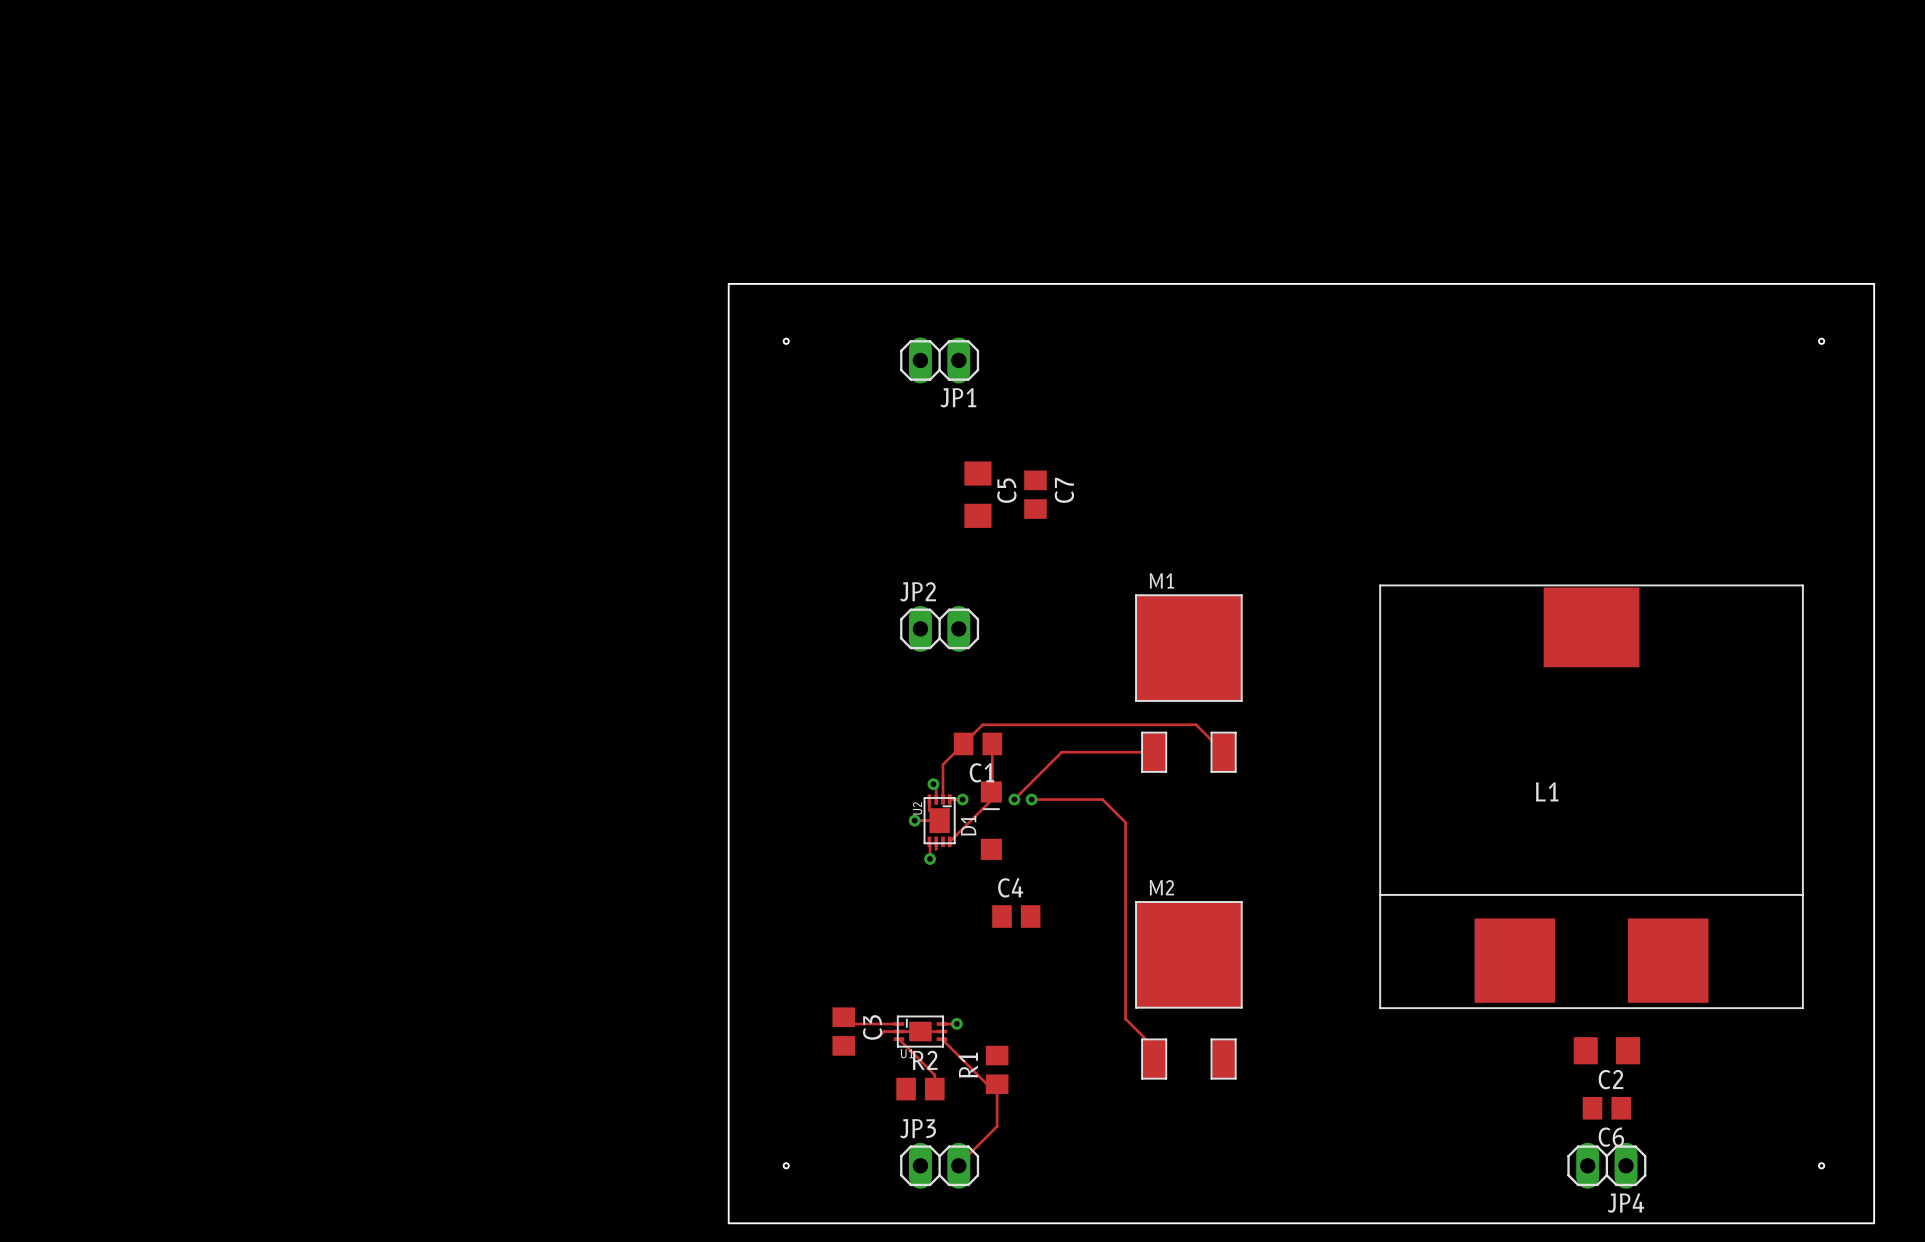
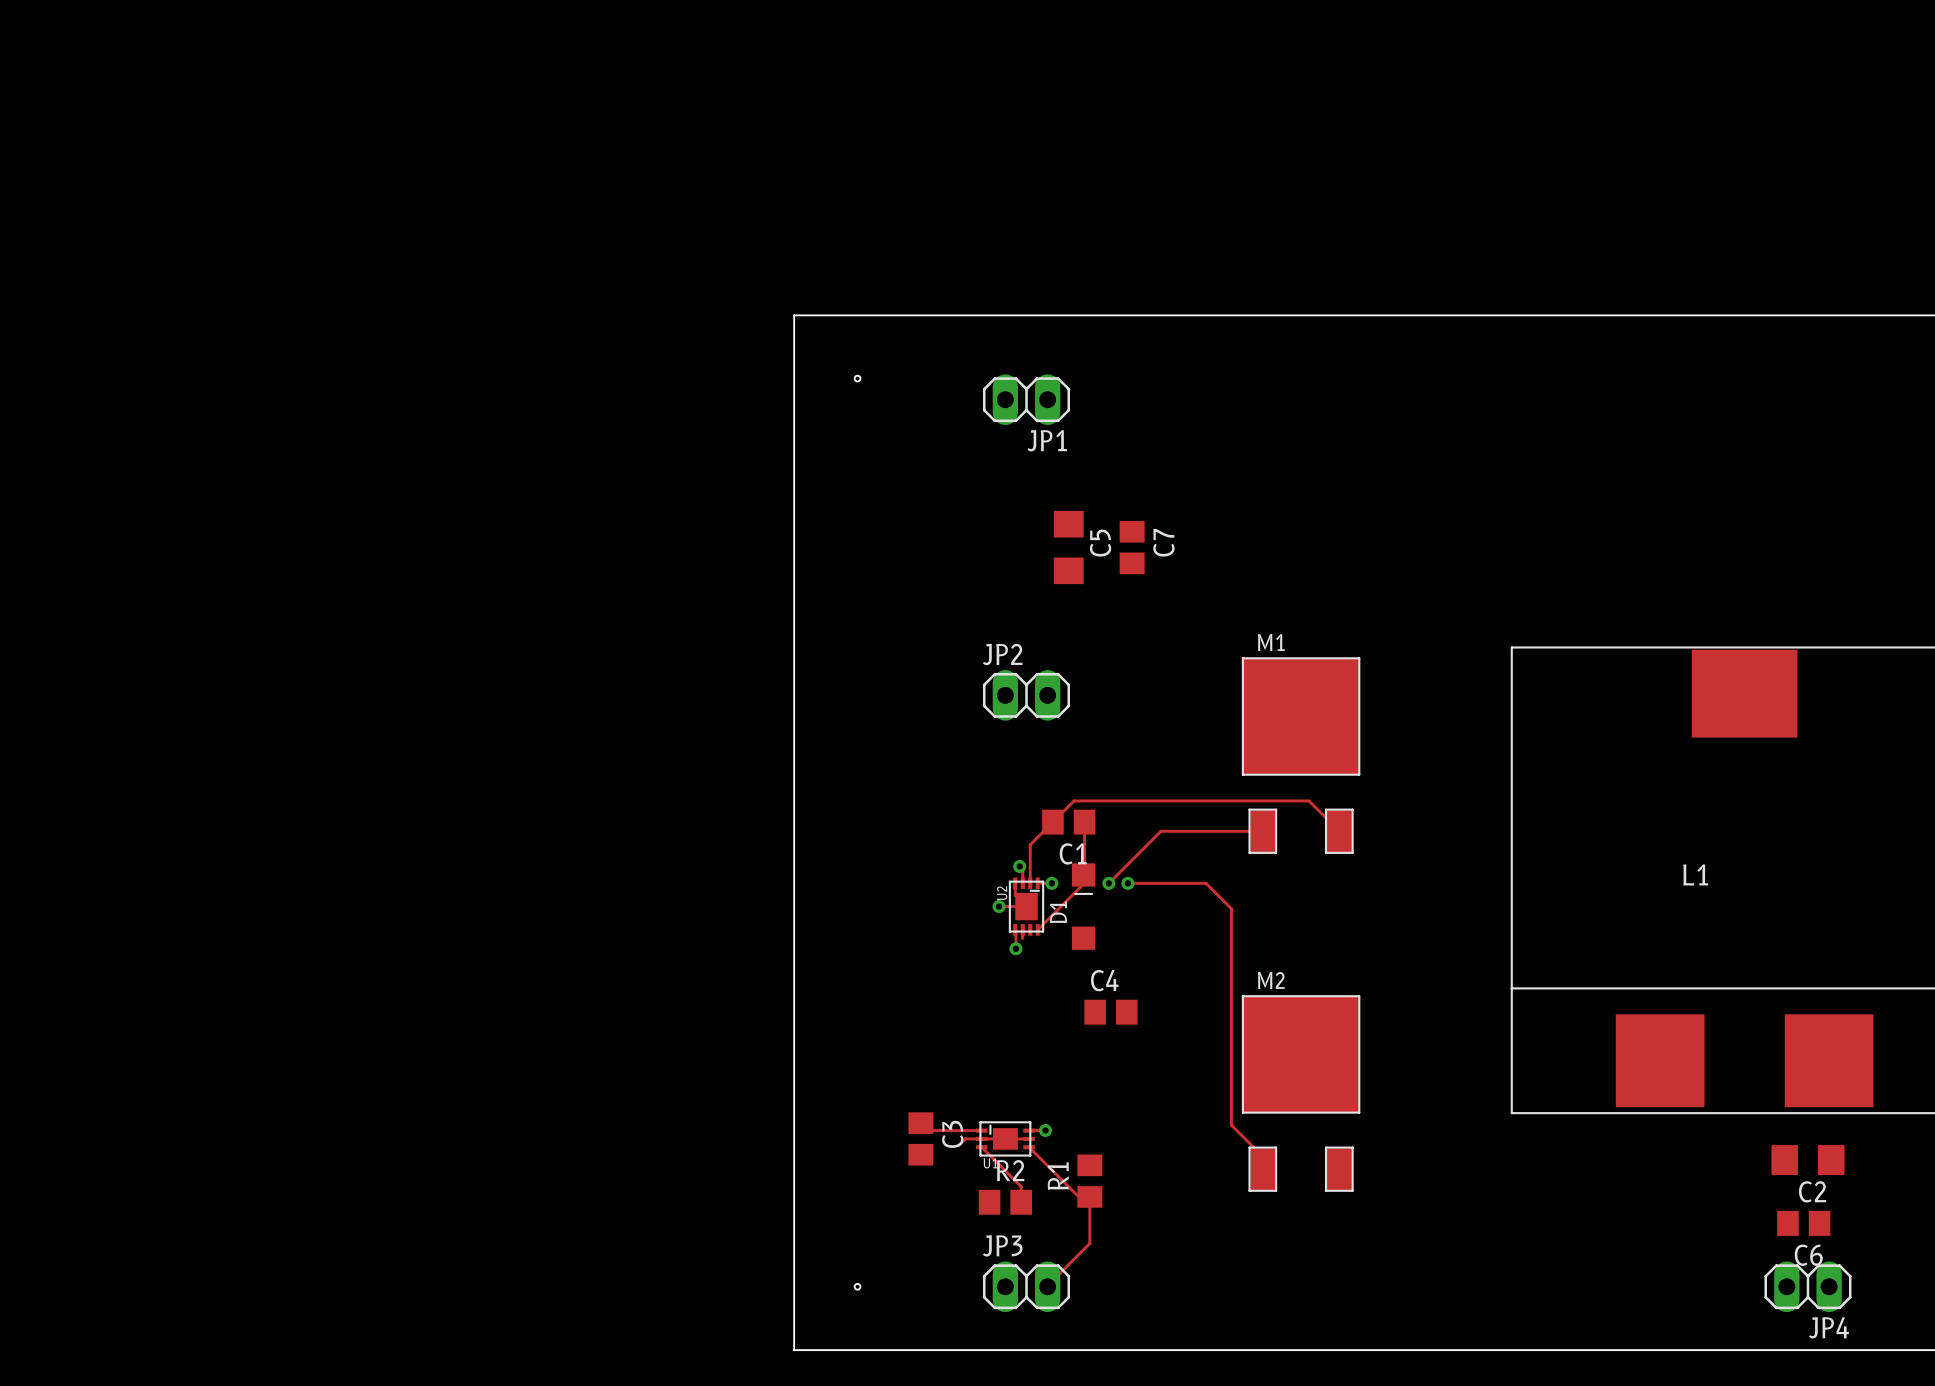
C2 position: (1606, 1050) -> (1807, 1160)
C6 position: (1606, 1108) -> (1803, 1223)
JP4 position: (1606, 1165) -> (1807, 1286)

